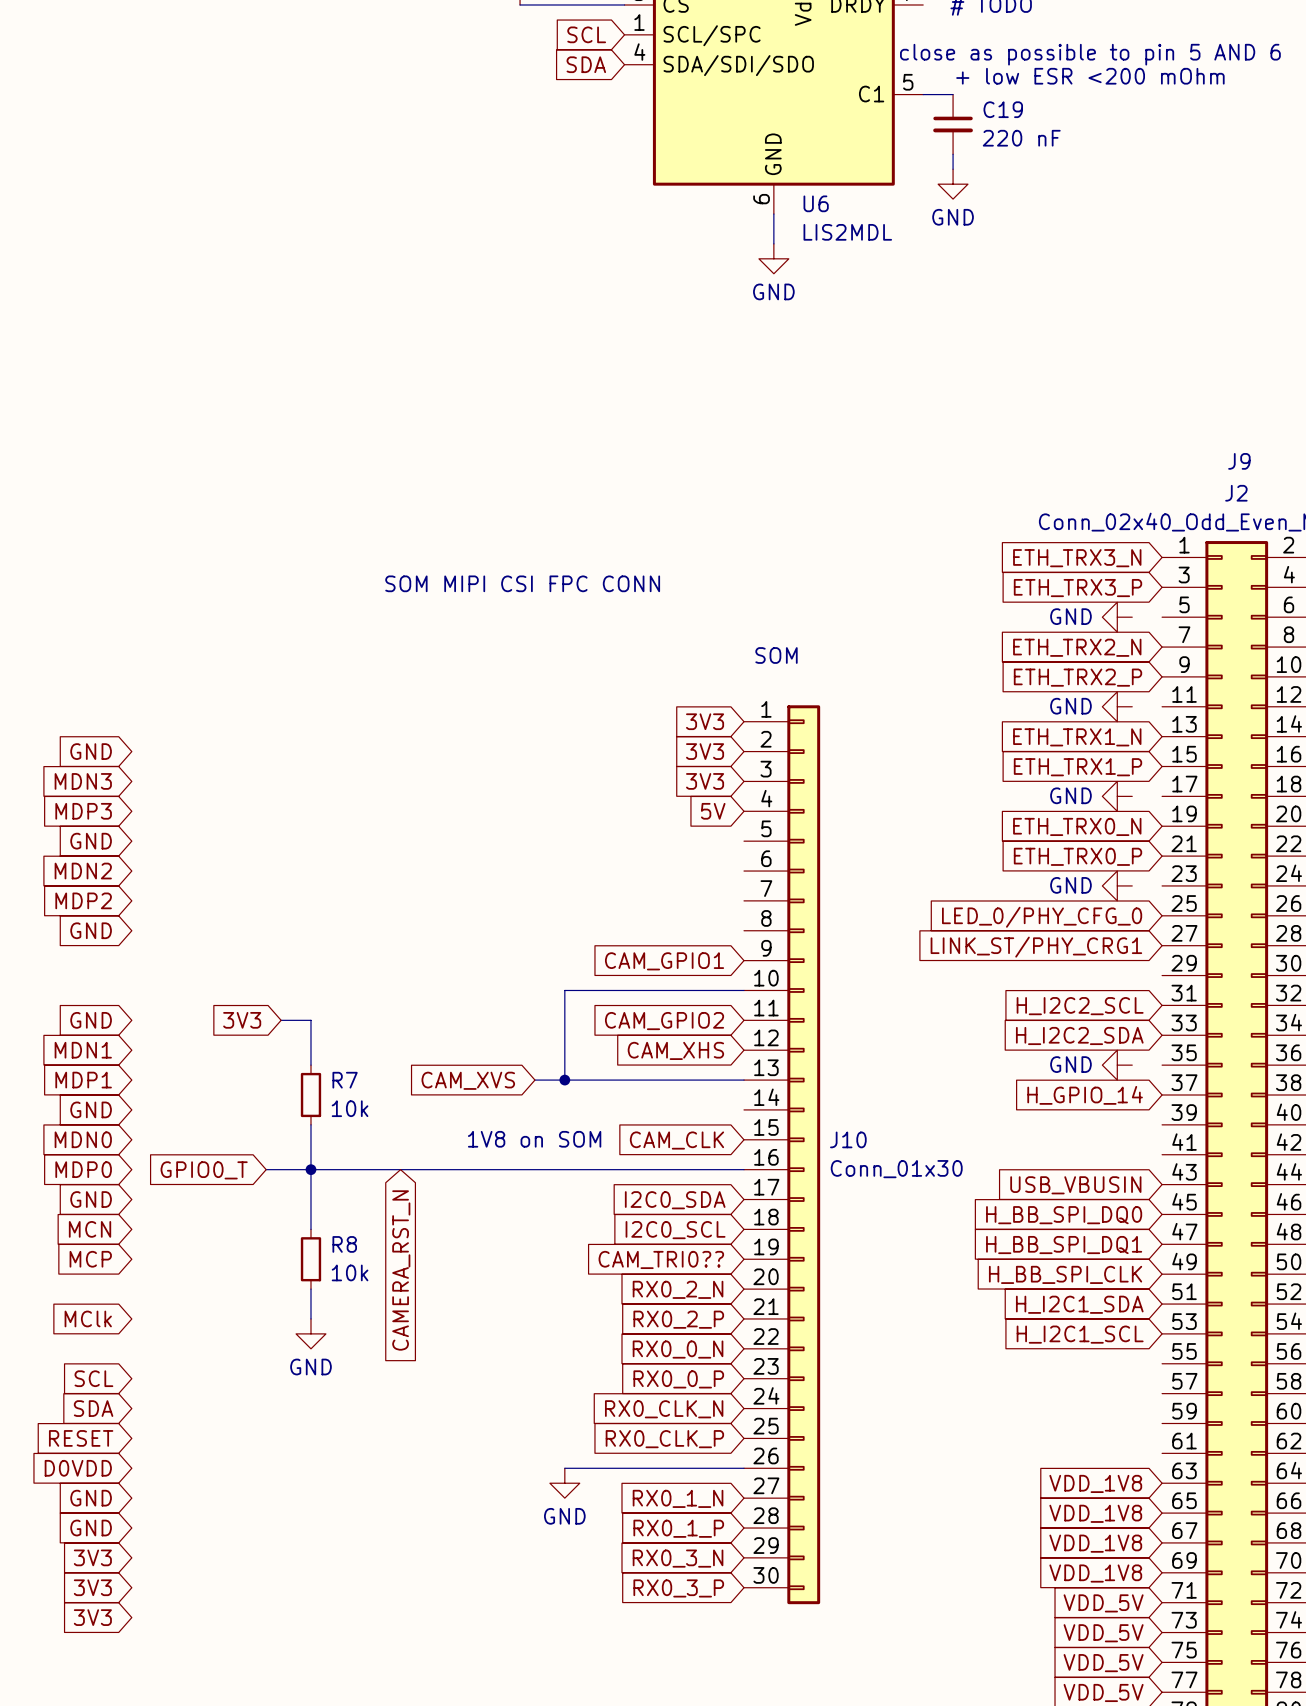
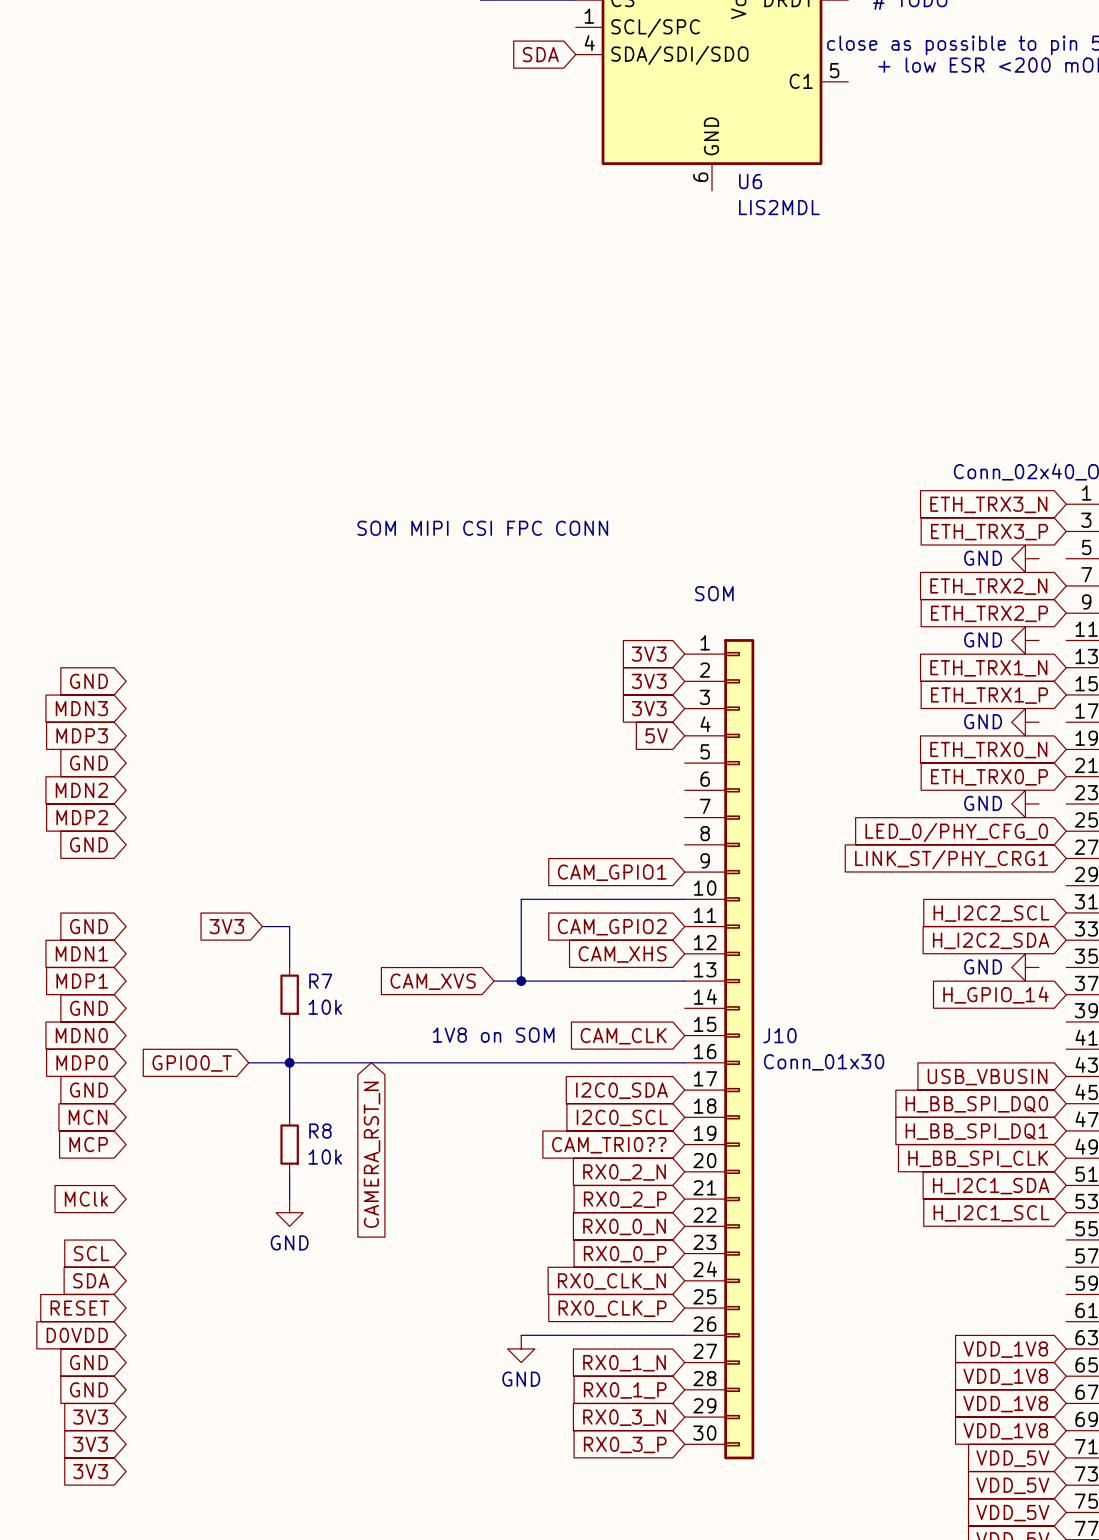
global label: SCL (586, 34) -> none
wire: (923, 94) (953, 94) -> none
C19: 220 nF (953, 124) -> none
wire: (953, 154) (953, 169) -> none
power symbol: GND (953, 184) -> none
wire: (773, 214) (773, 243) -> none
power symbol: GND (773, 258) -> none

